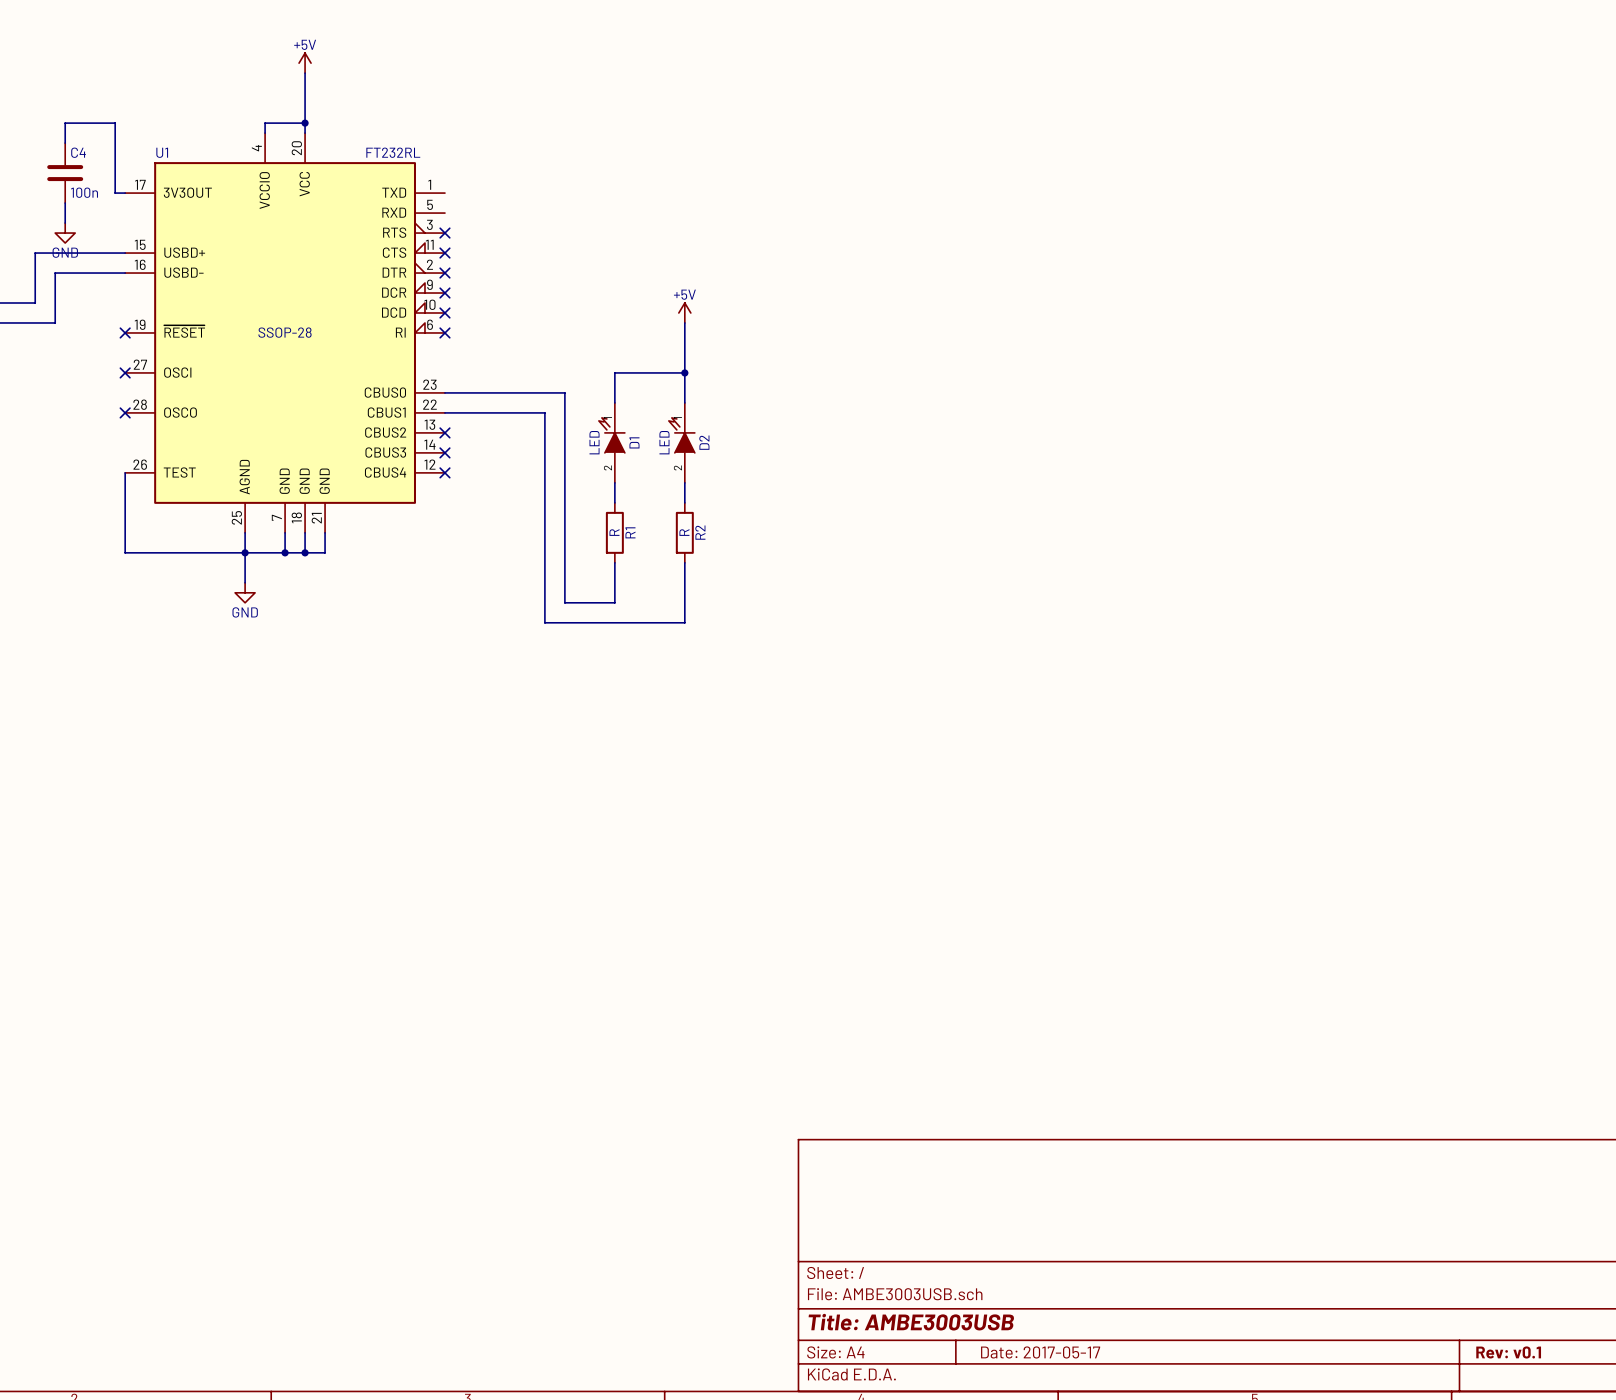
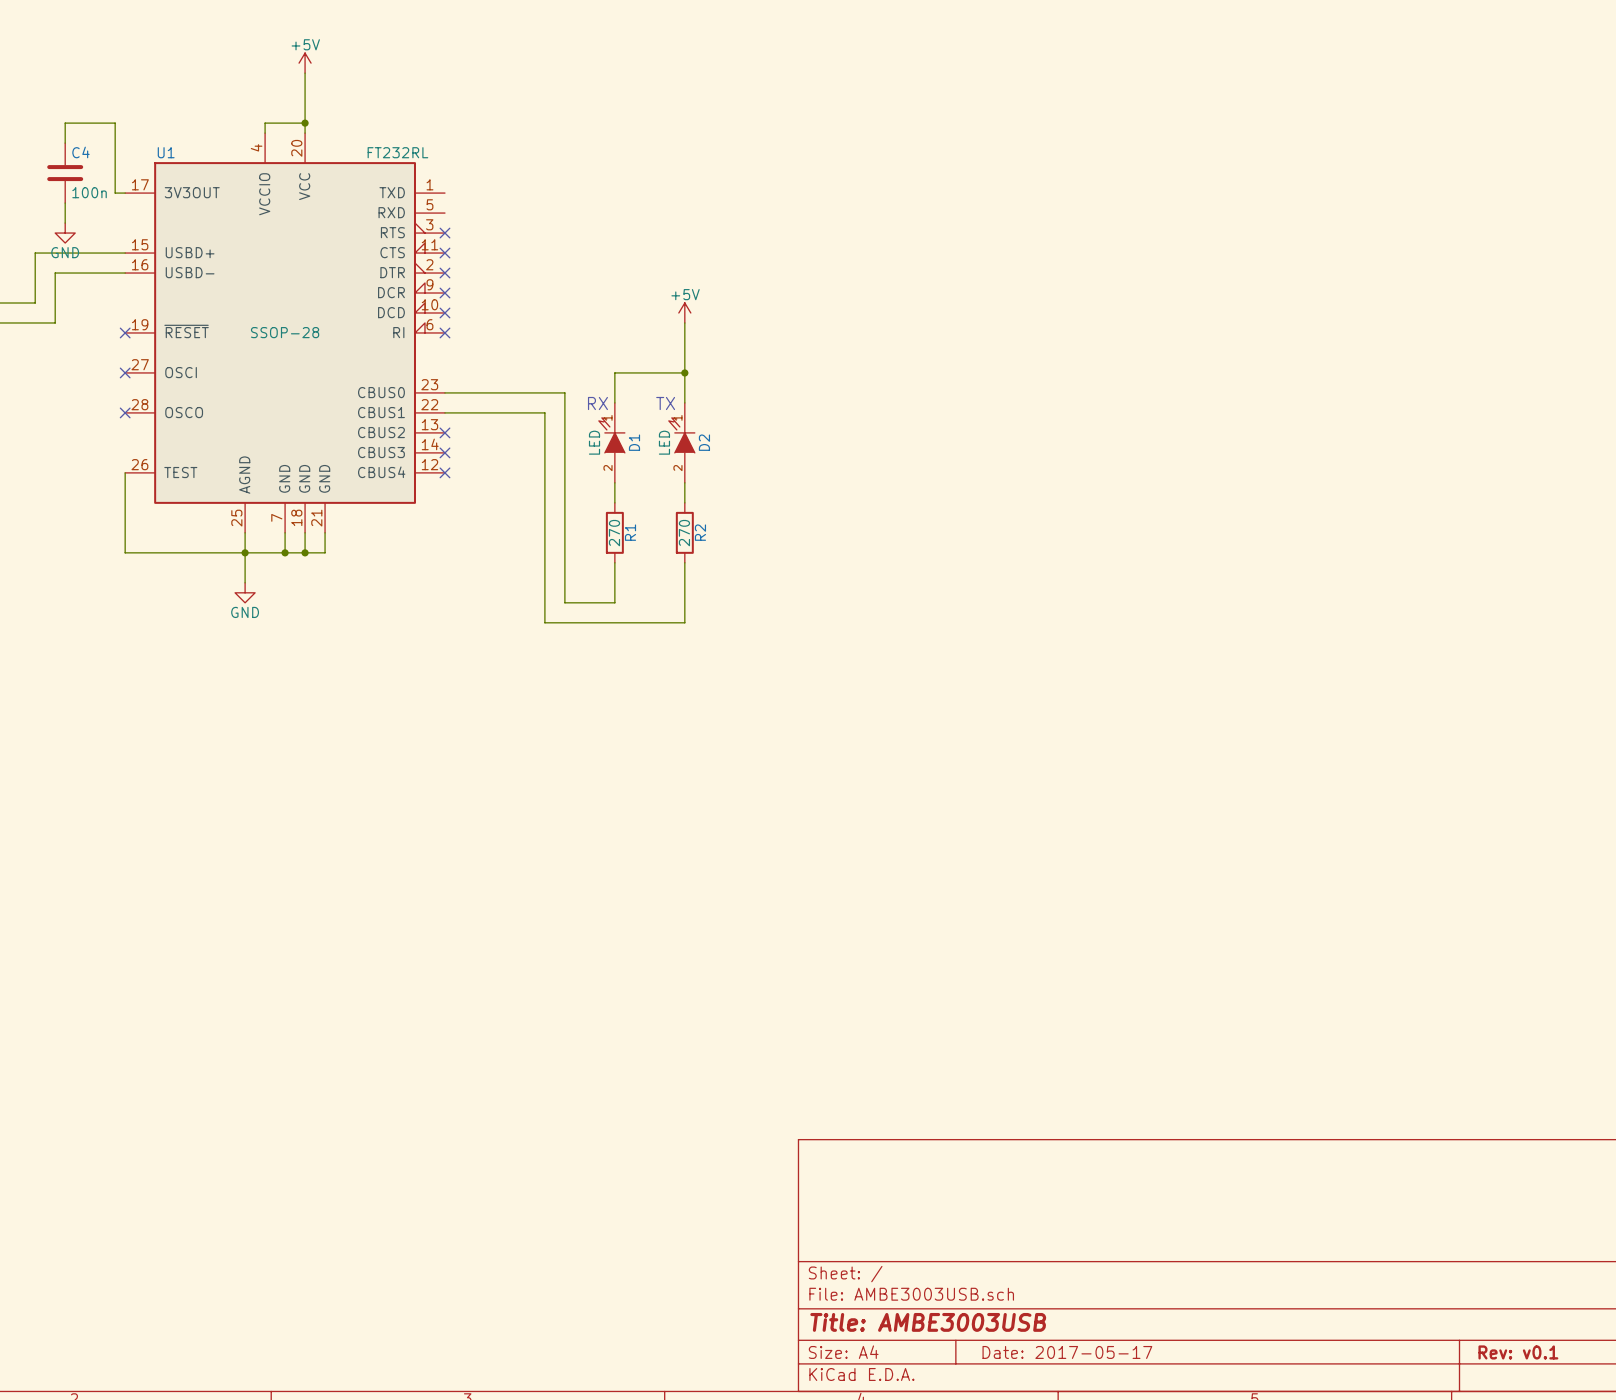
text: none -> RX (597, 403)
text: none -> TX (665, 403)
R1 value: R (614, 532) -> 270 (614, 533)
R2 value: R (684, 532) -> 270 (684, 533)

